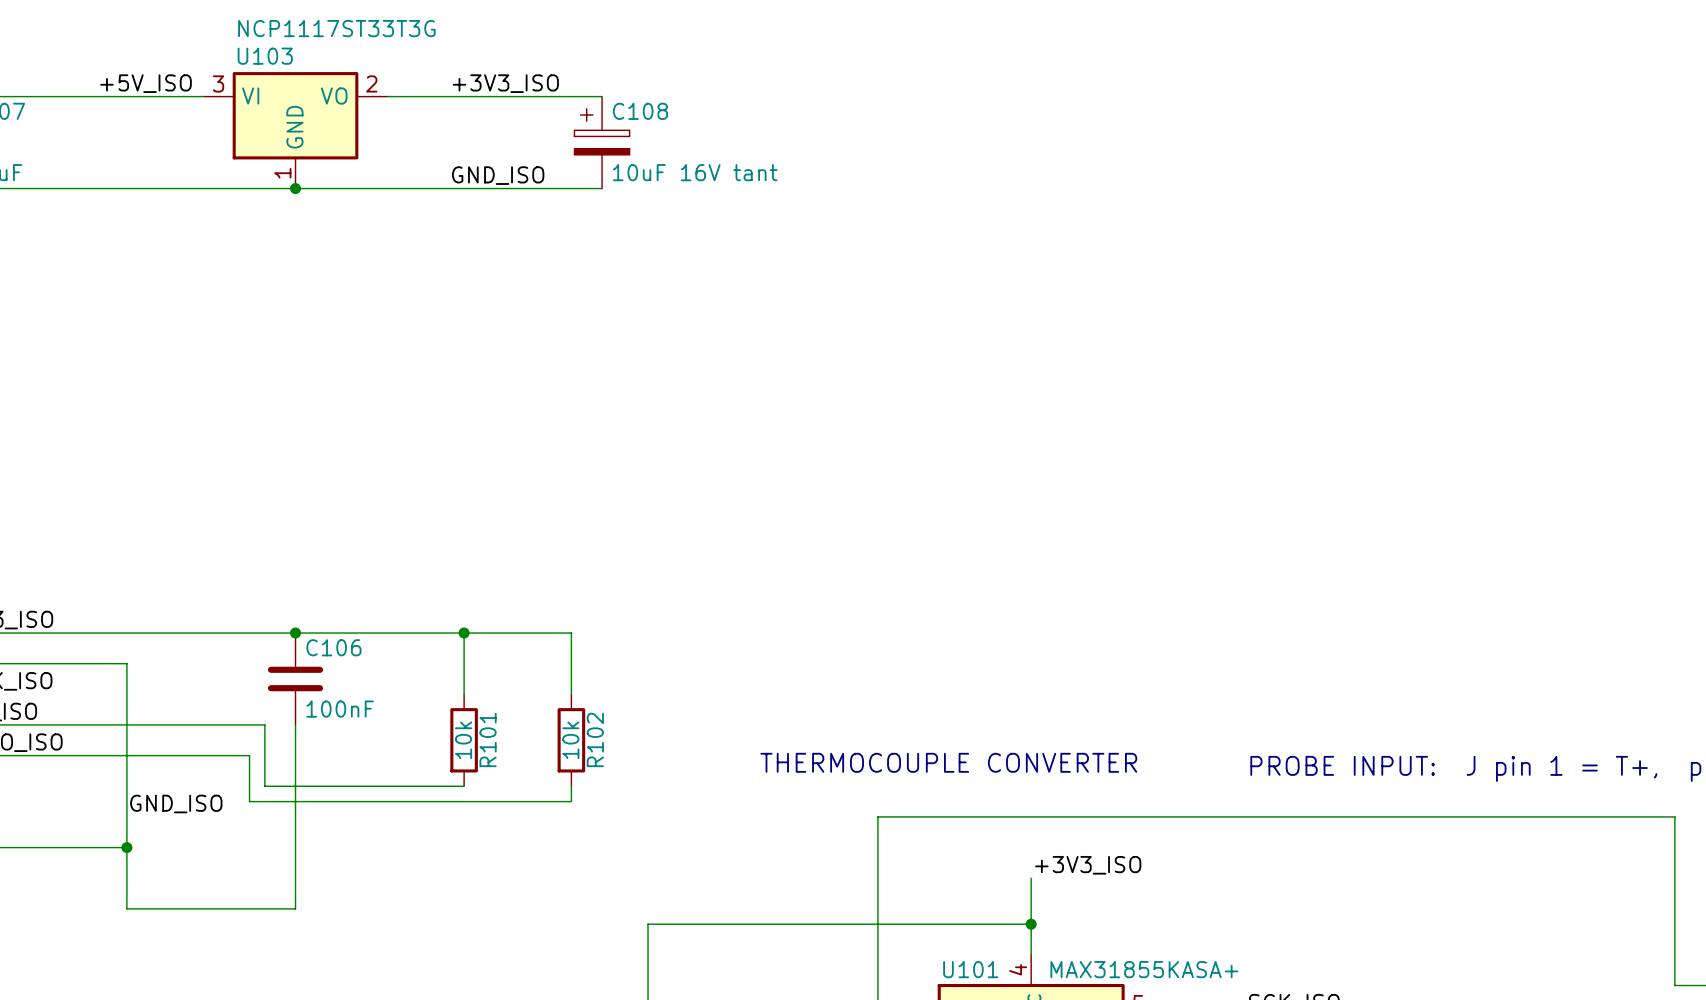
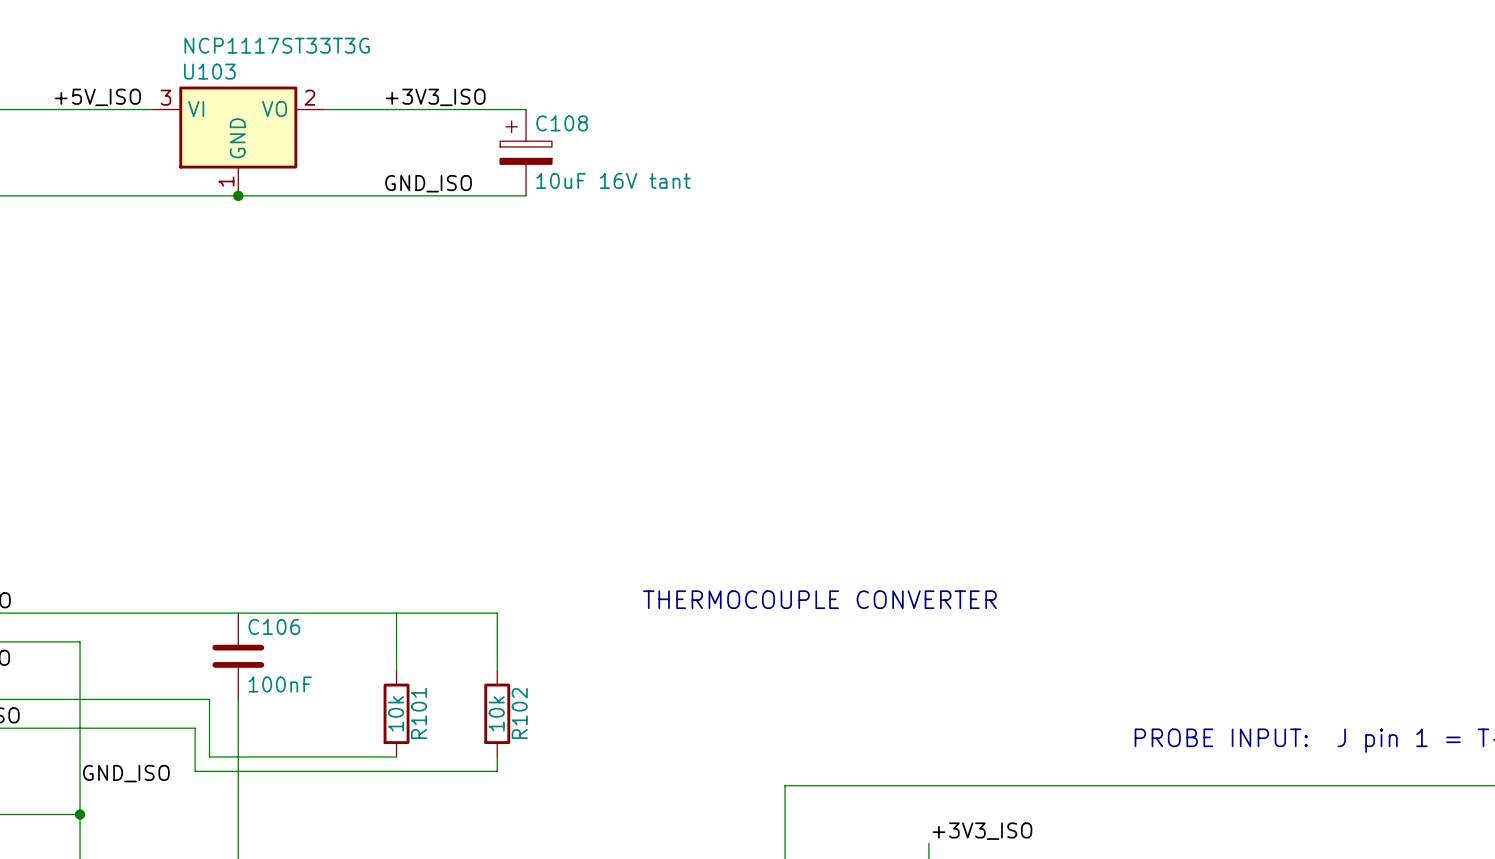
junction: (295, 633) -> none
junction: (464, 633) -> none
text position: THERMOCOUPLE CONVERTER (948, 762) -> THERMOCOUPLE CONVERTER (819, 599)

